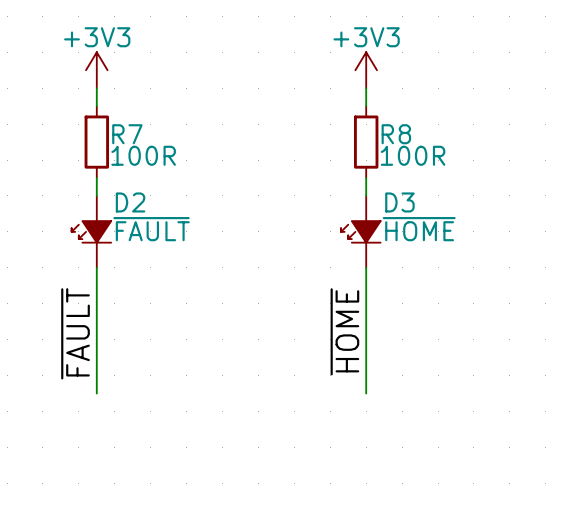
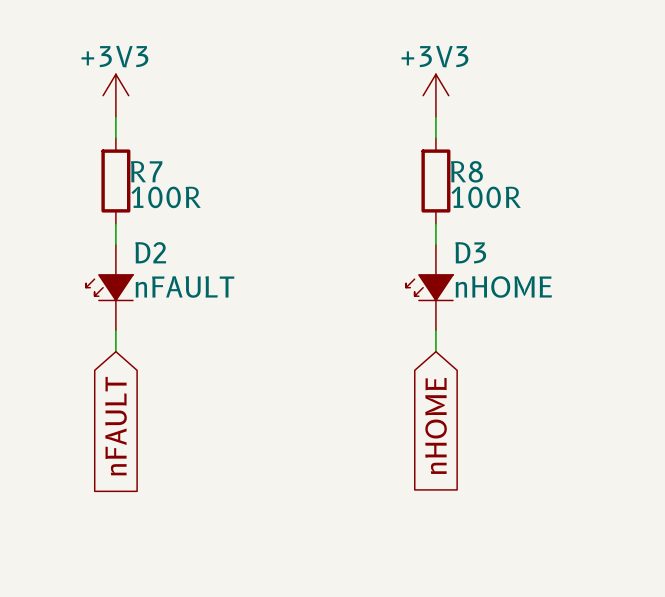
D2 value: ~{FAULT} (151, 229) -> nFAULT (185, 286)
D3 value: ~{HOME} (419, 229) -> nHOME (503, 286)
wire: (96, 285) (96, 393) -> none
wire: (366, 285) (366, 393) -> none
label: ~{HOME} (344, 331) -> none
label: ~{FAULT} (75, 333) -> none
global label: none -> nHOME (436, 425)
global label: none -> nFAULT (116, 426)

